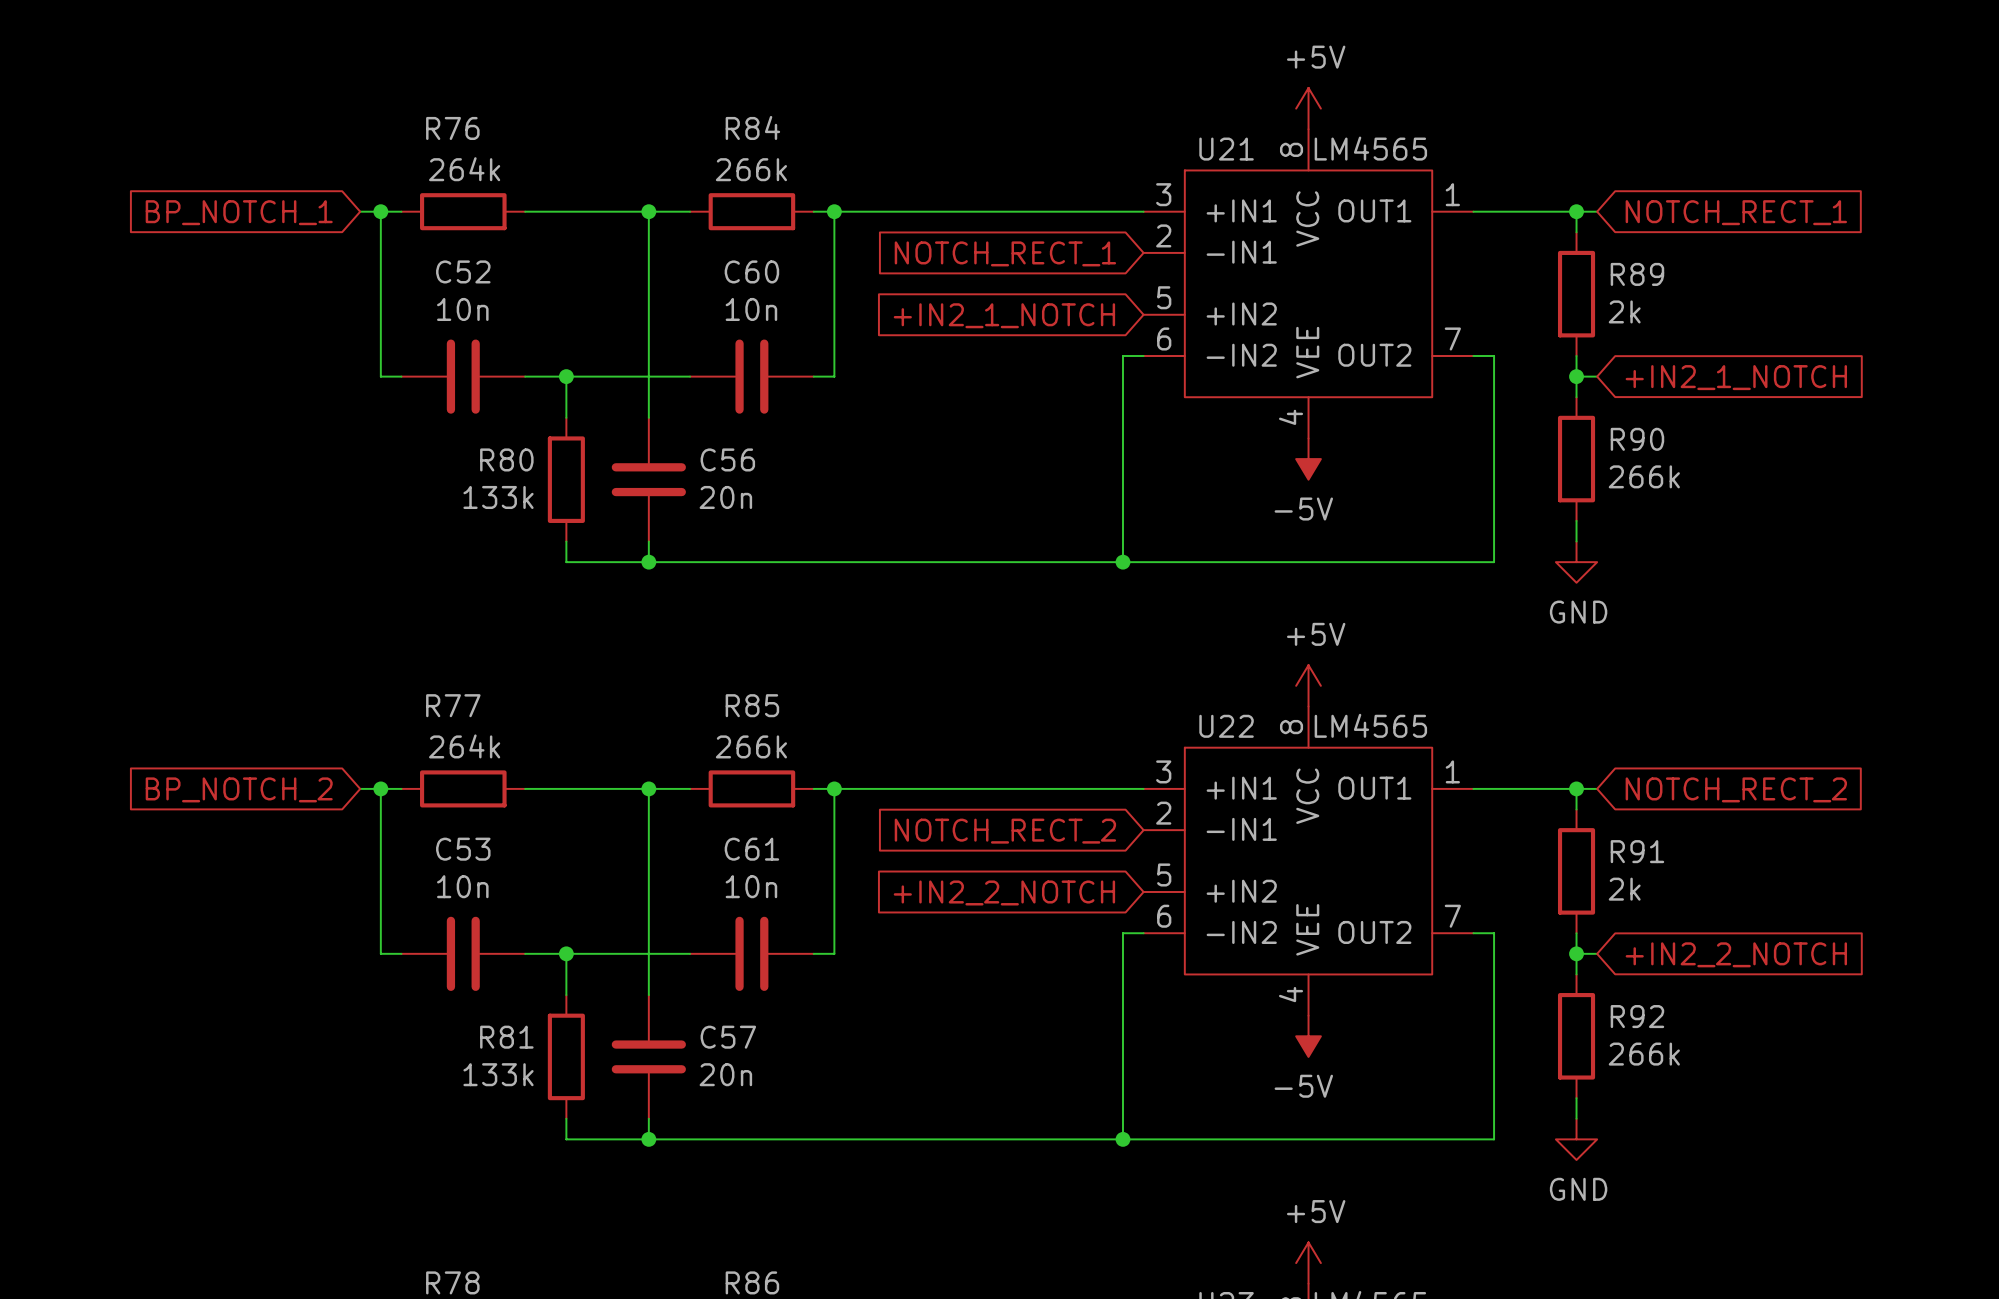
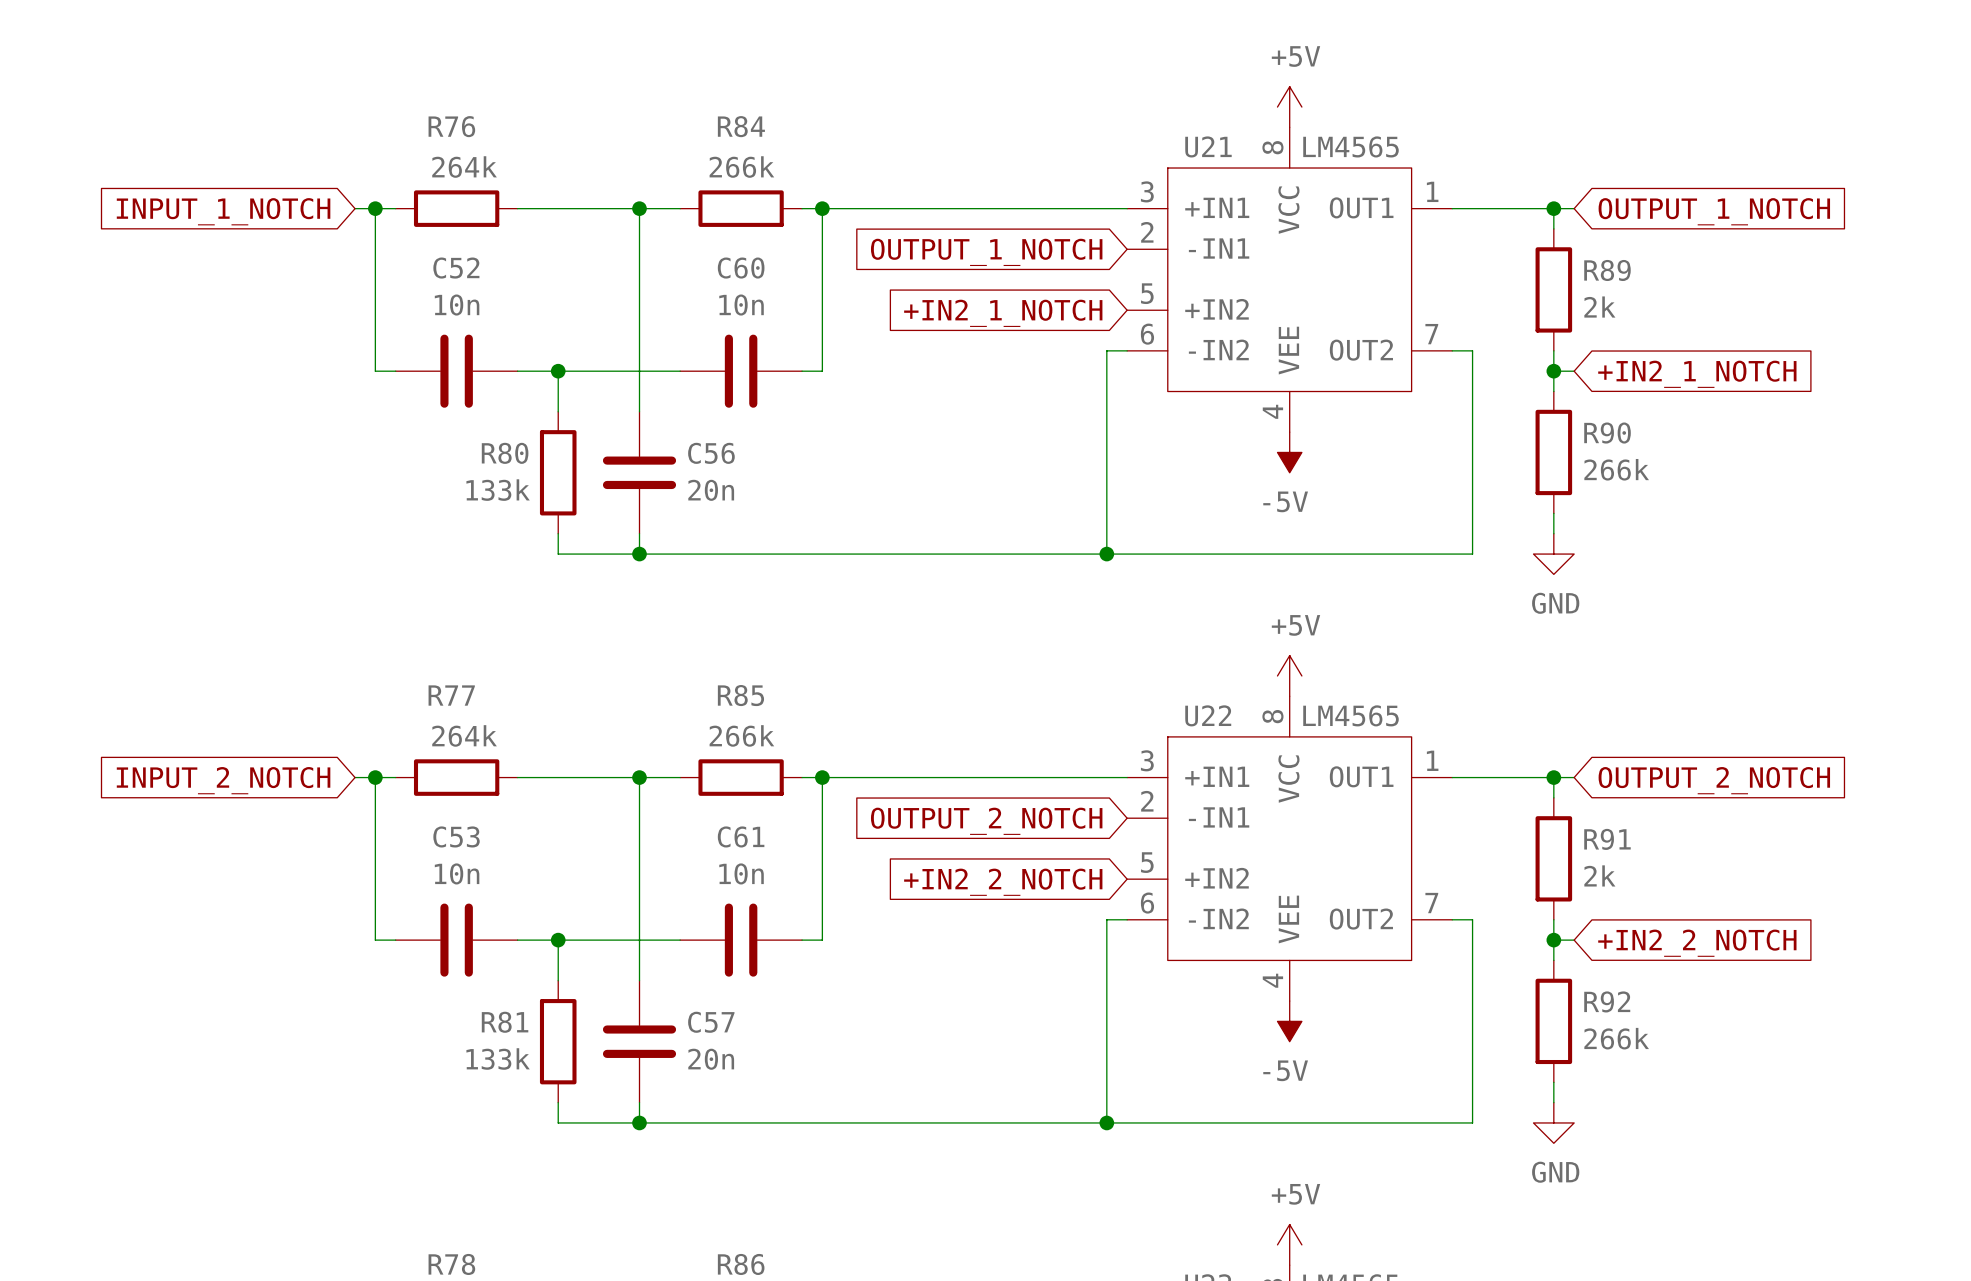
global label: BP_NOTCH_1 (239, 212) -> INPUT_1_NOTCH (223, 211)
global label: NOTCH_RECT_1 (1736, 212) -> OUTPUT_1_NOTCH (1714, 211)
global label: NOTCH_RECT_1 (1005, 253) -> OUTPUT_1_NOTCH (986, 252)
global label: BP_NOTCH_2 (239, 789) -> INPUT_2_NOTCH (223, 780)
global label: NOTCH_RECT_2 (1736, 789) -> OUTPUT_2_NOTCH (1714, 780)
global label: NOTCH_RECT_2 (1005, 831) -> OUTPUT_2_NOTCH (986, 821)

